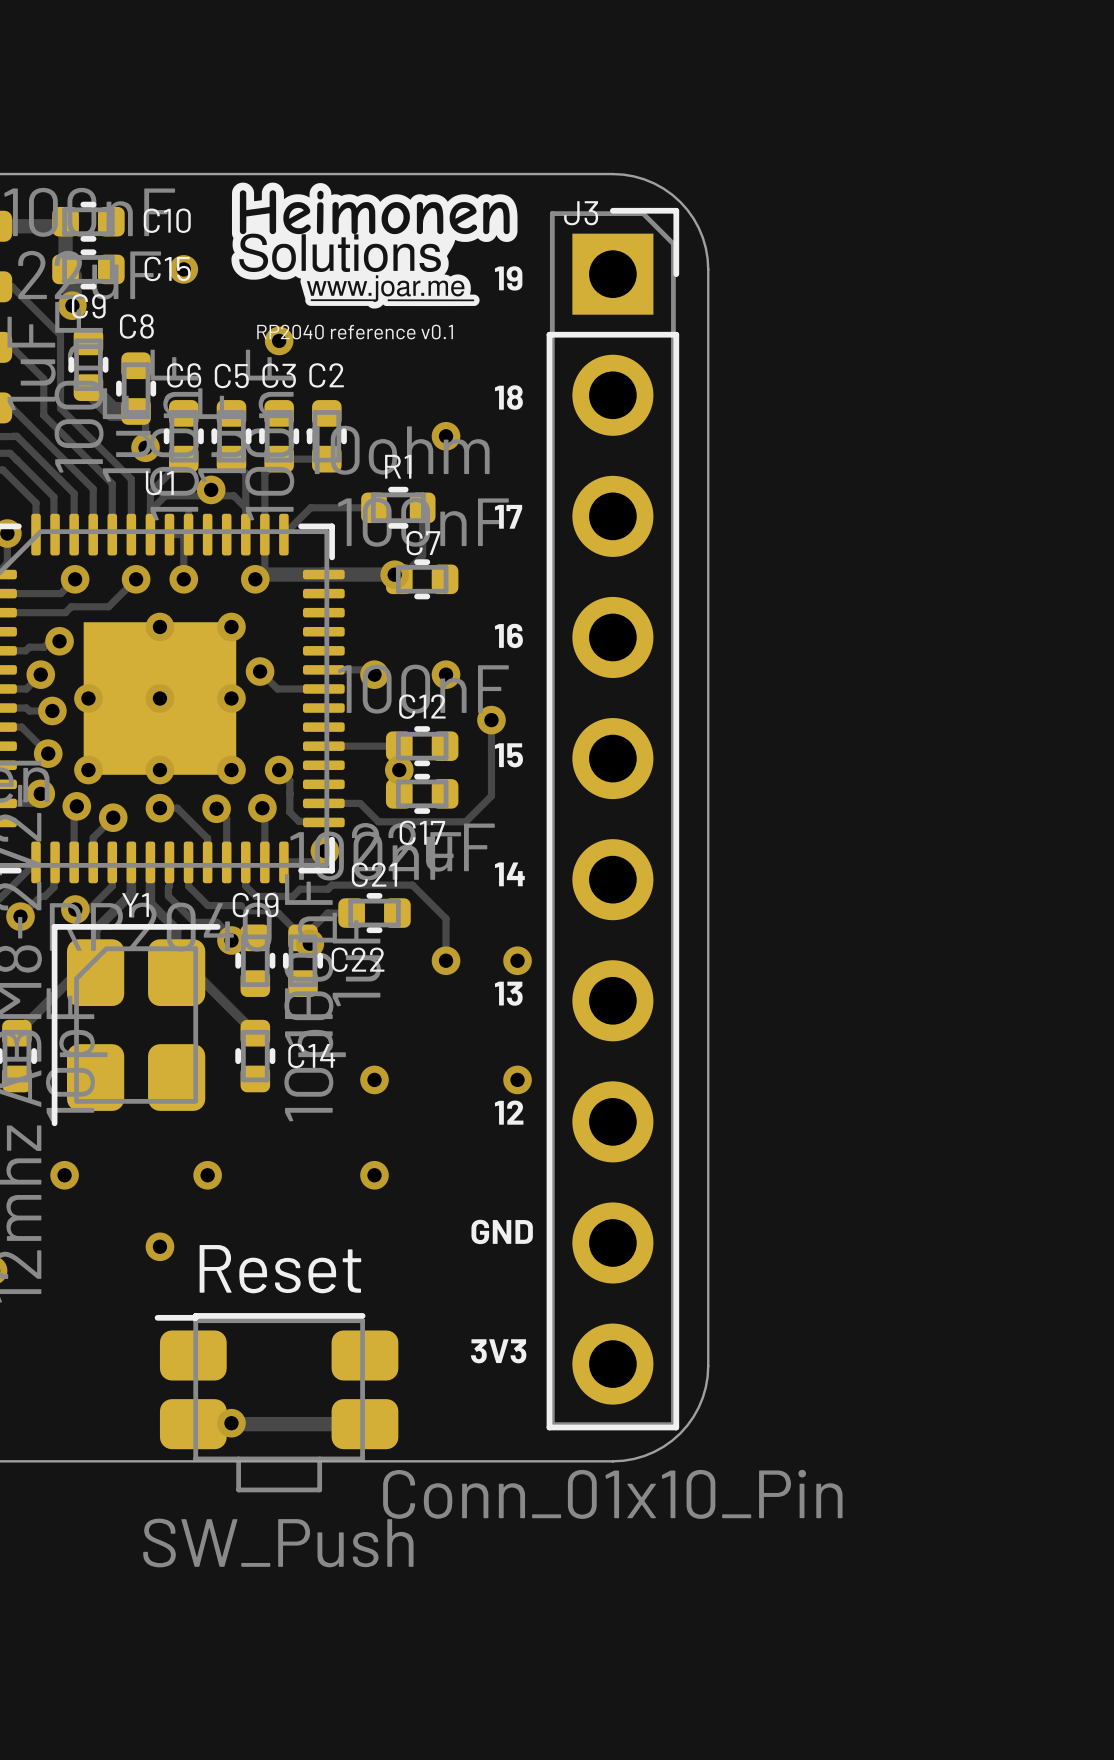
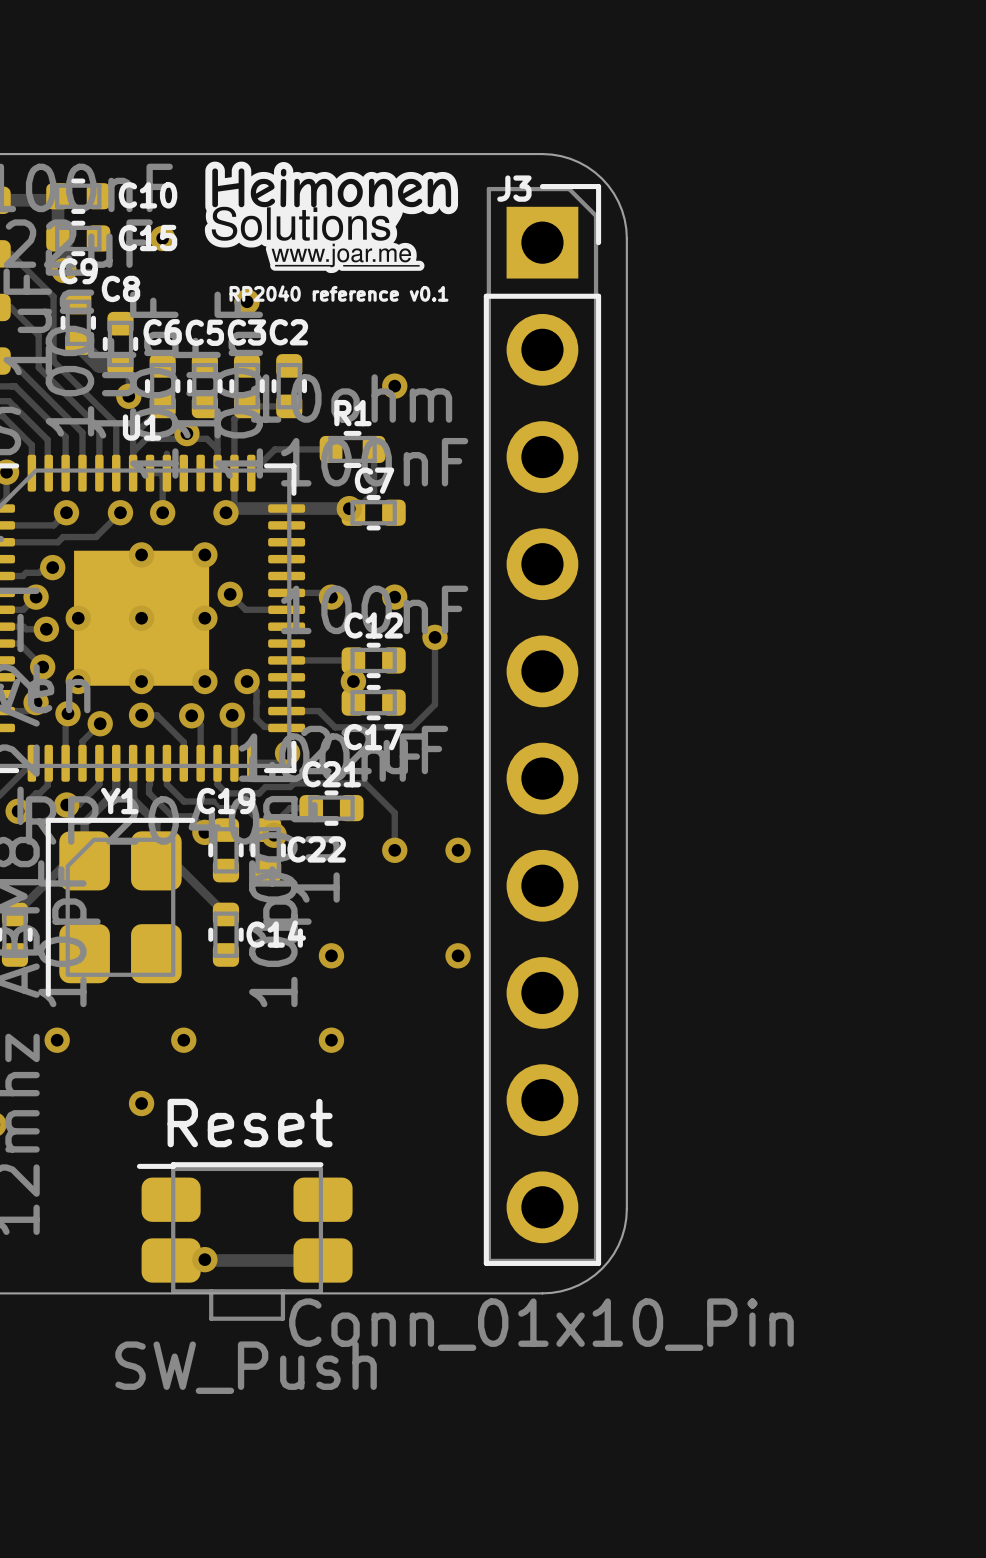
text: 19 (508, 278) -> none
text: 18 (508, 397) -> none
text: 17 (508, 516) -> none
text: 16 (508, 635) -> none
text: 15 (508, 755) -> none
text: 14 (509, 874) -> none
text: 13 (508, 993) -> none
text: 12 (509, 1112) -> none
text: GND (502, 1231) -> none
text: 3V3 (498, 1351) -> none

